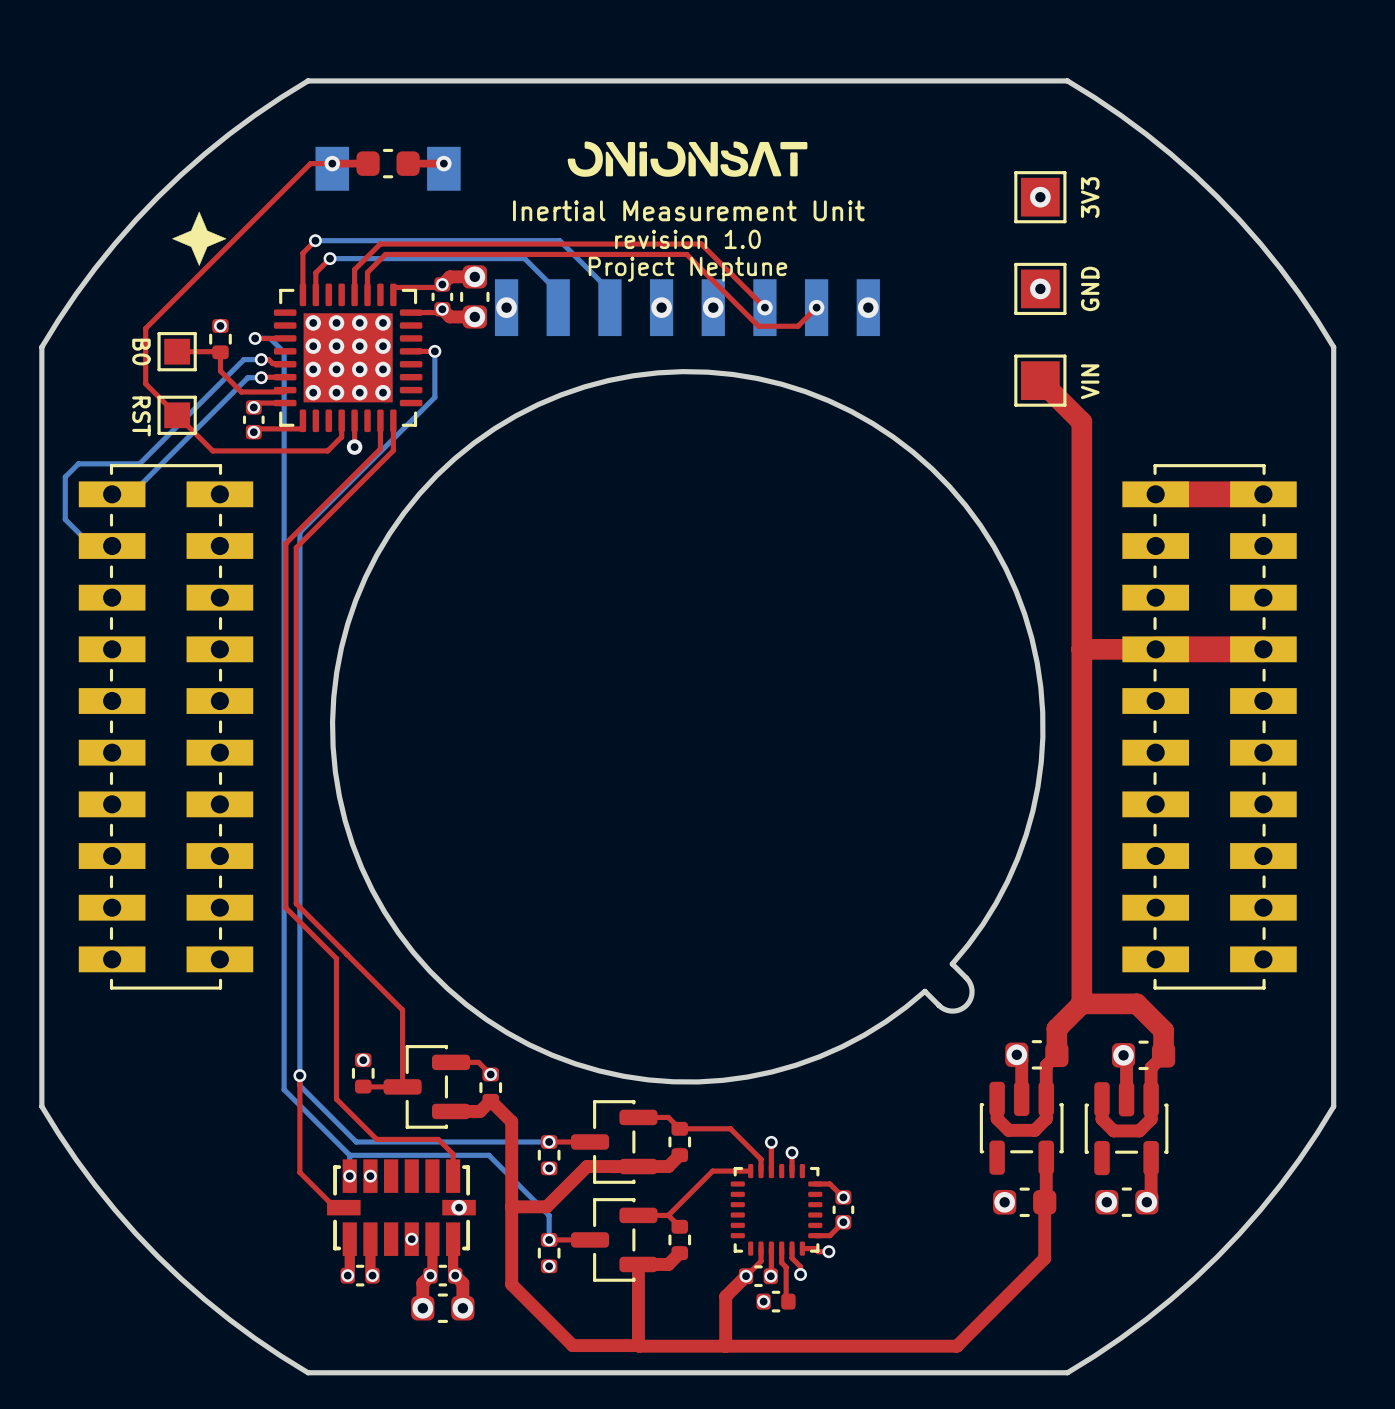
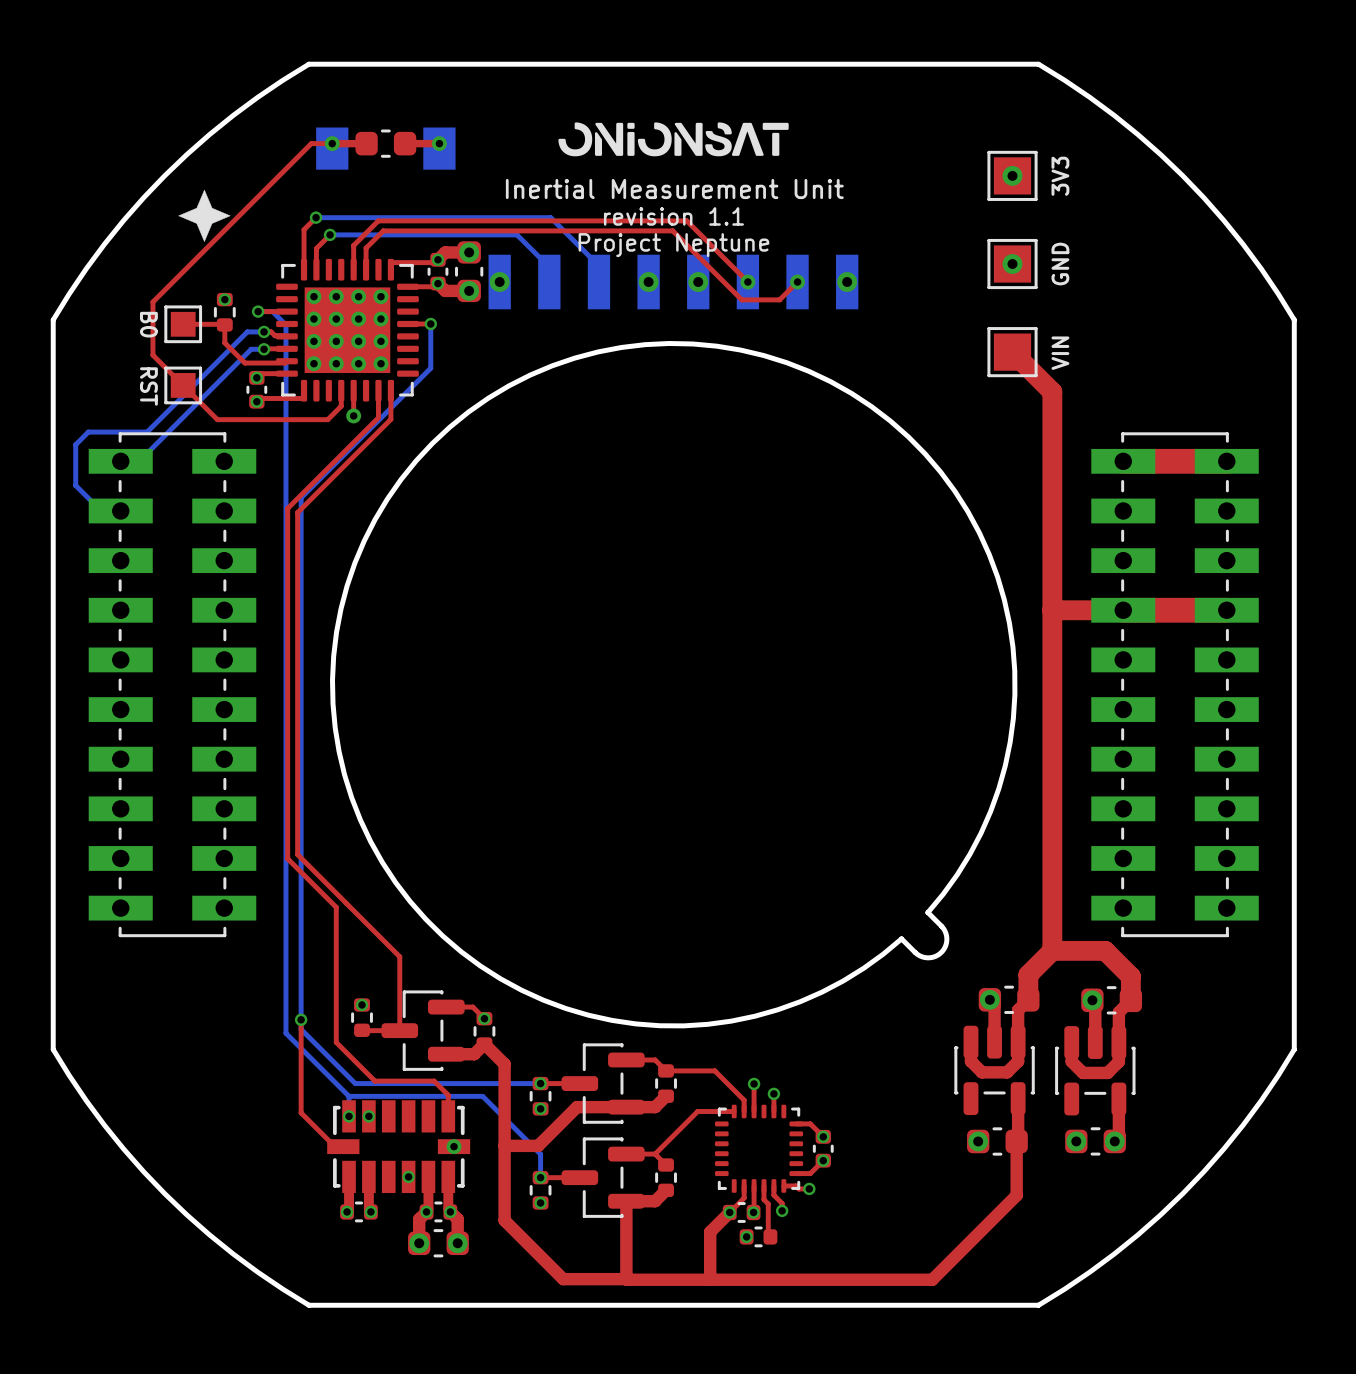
text: revision 1.0 (687, 239) -> revision 1.1 (673, 216)

